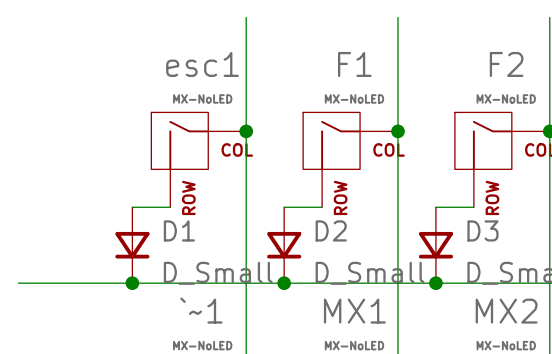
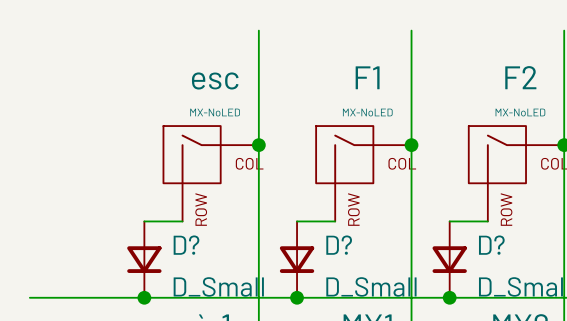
esc1 name: esc1 (202, 64) -> esc (215, 80)
D1 name: D1 (179, 230) -> D? (186, 245)
D2 name: D2 (331, 230) -> D? (339, 245)
D3 name: D3 (482, 230) -> D? (491, 245)

